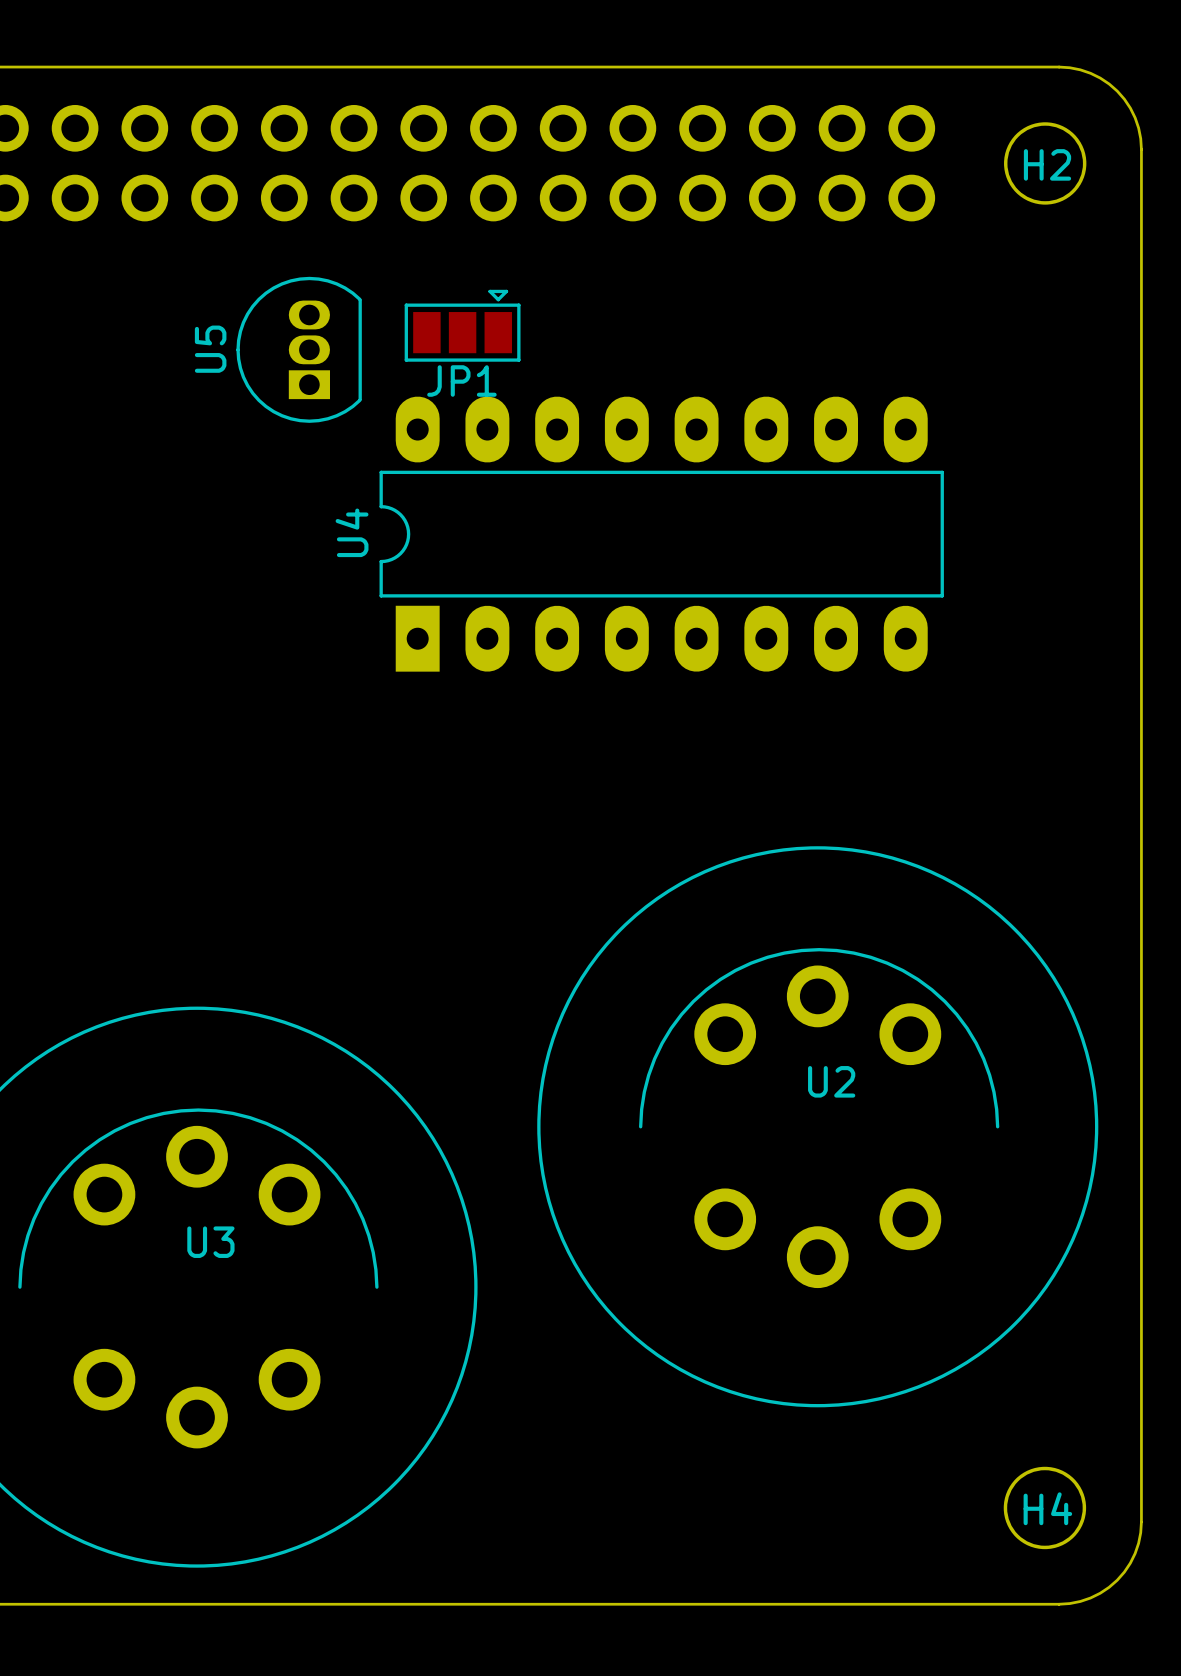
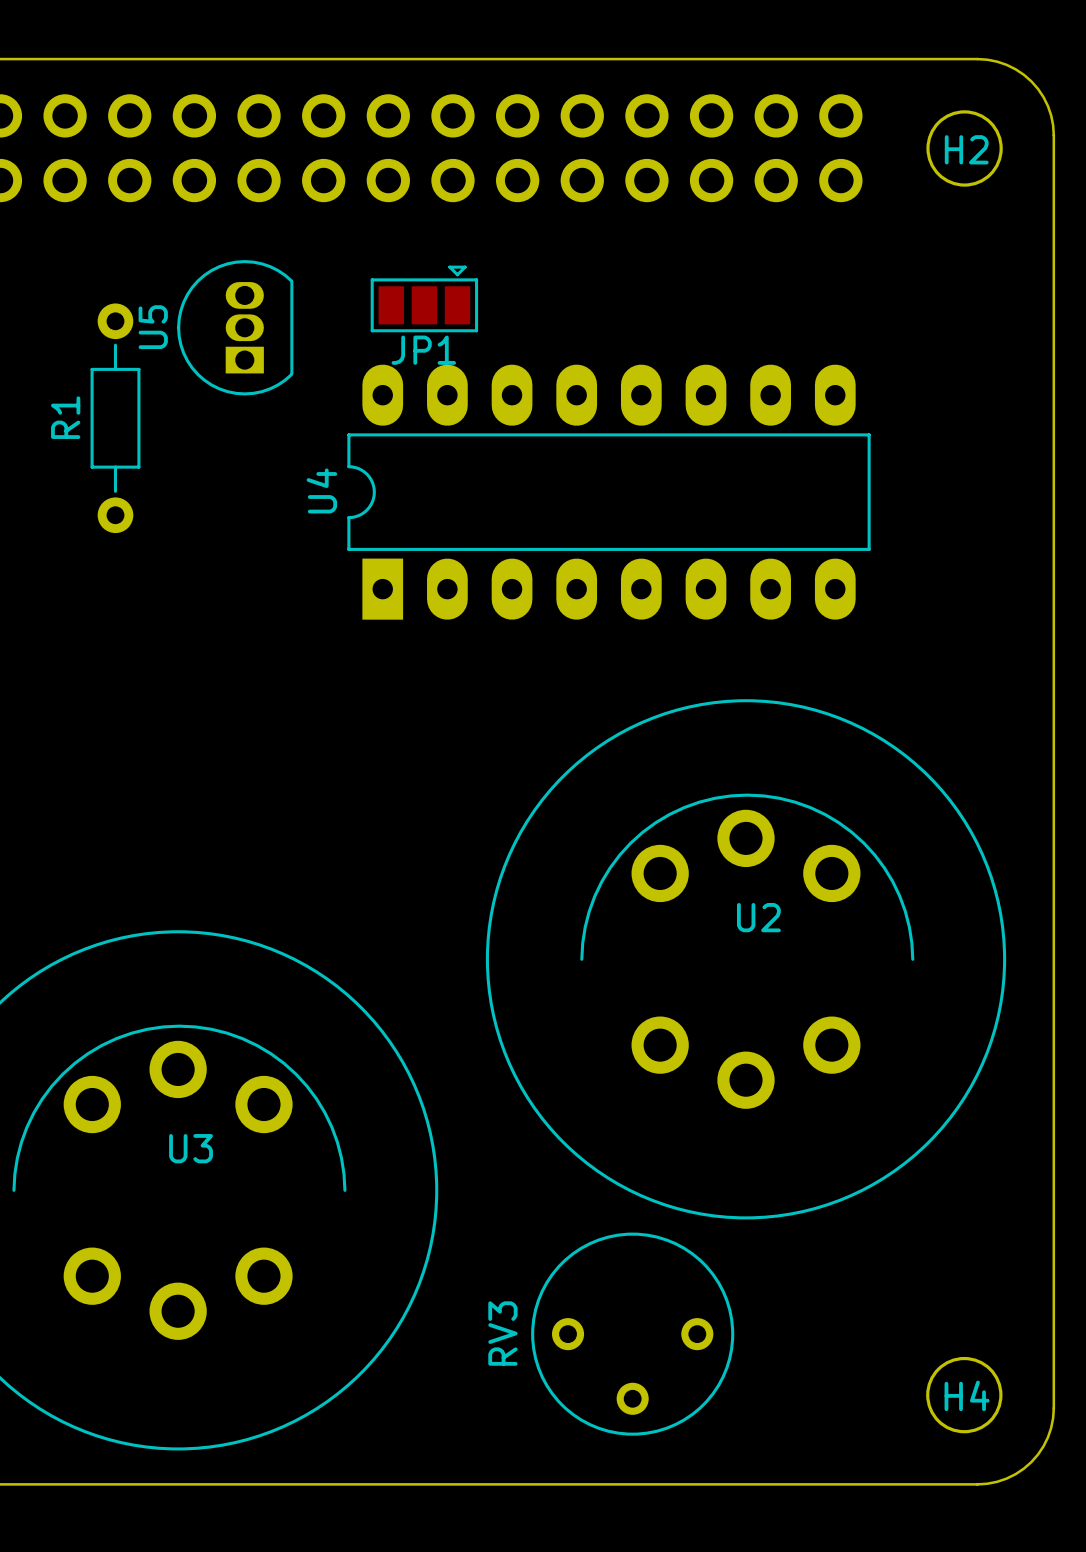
U5 position: (299, 349) -> (235, 327)
R1: none -> (115, 418)
U2 position: (817, 1126) -> (746, 959)
RV3: none -> (632, 1334)

